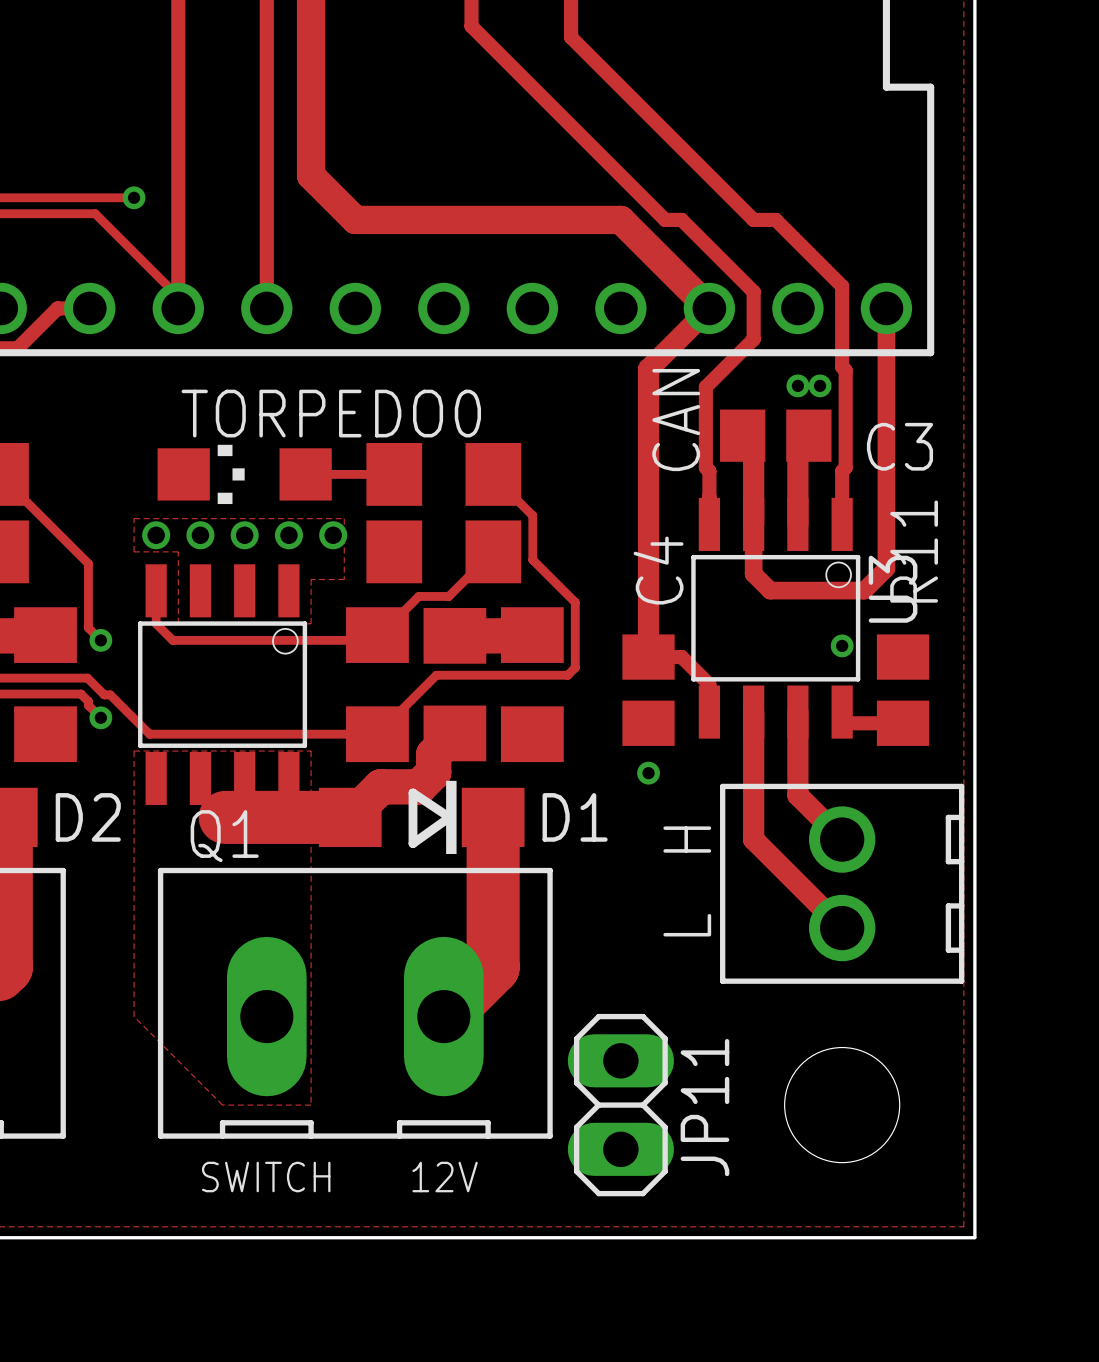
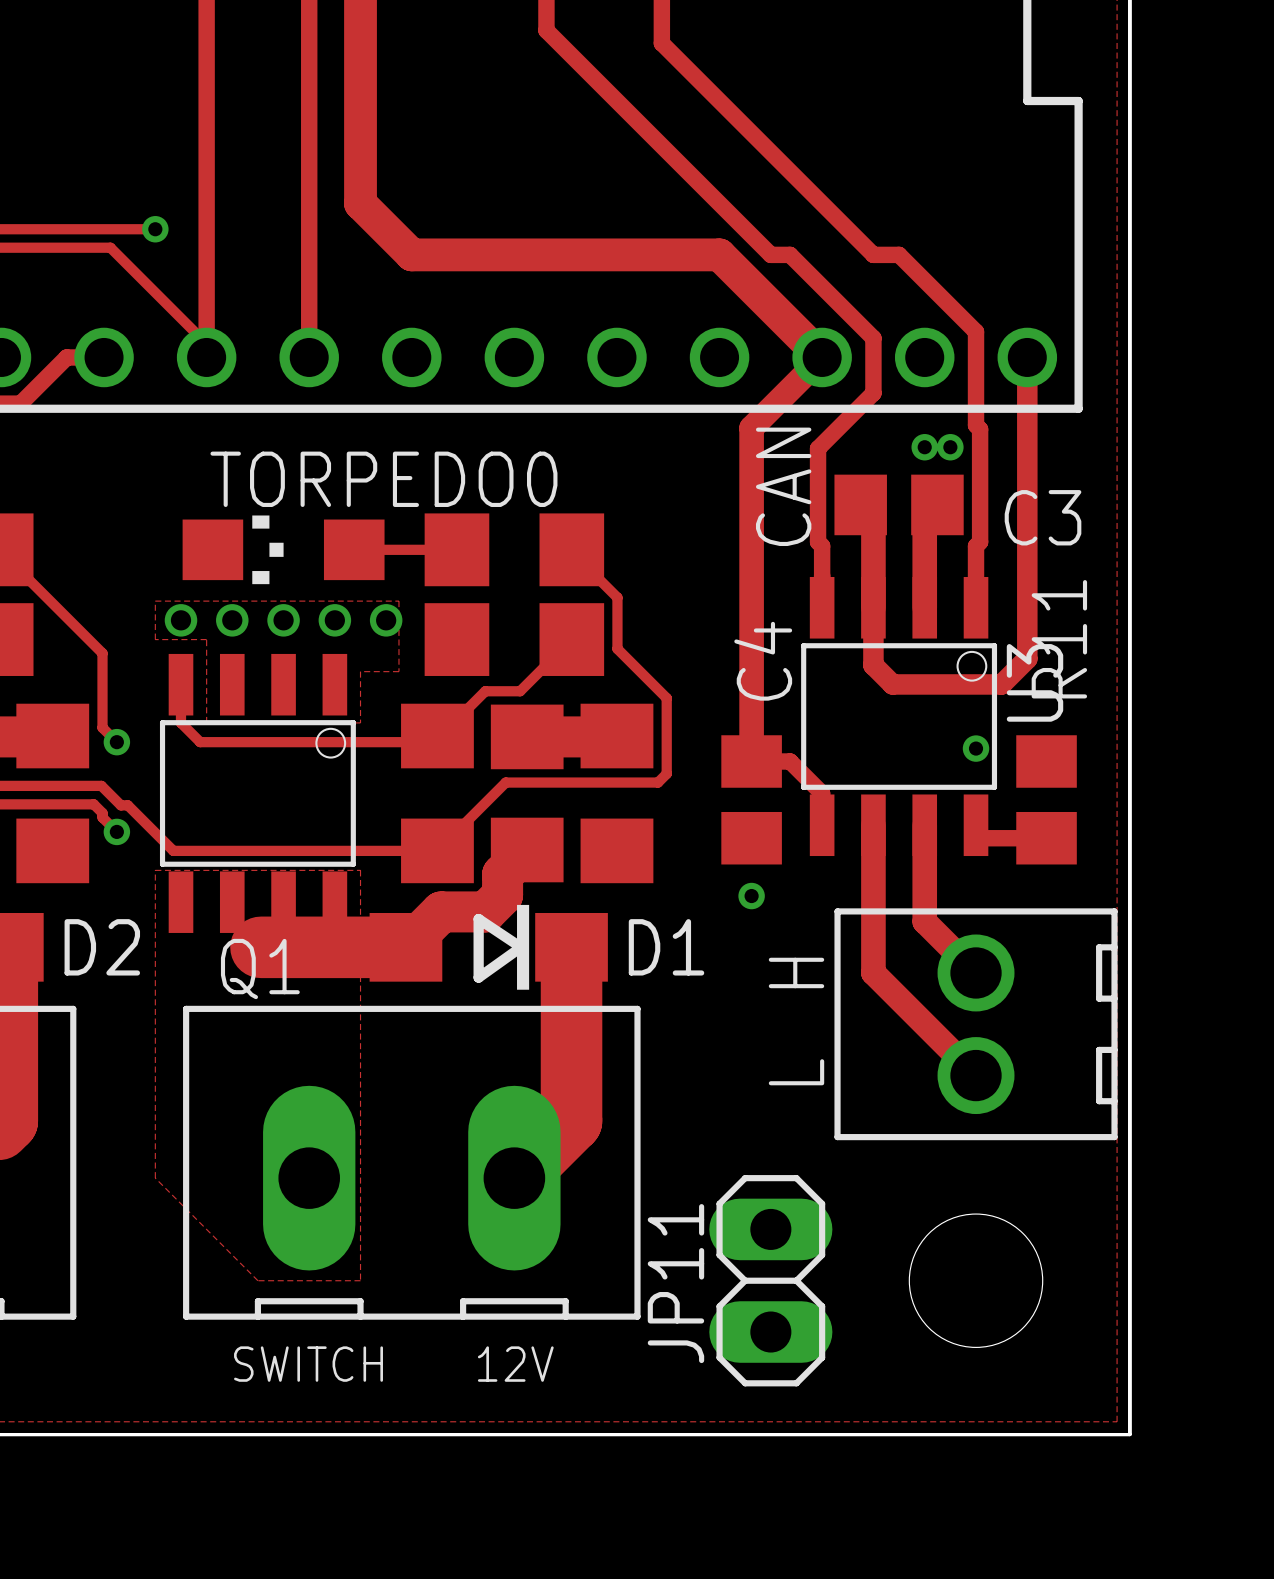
JP11 position: (620, 1105) -> (770, 1280)
JP11 name position: JP11 (704, 1107) -> JP11 (675, 1283)

